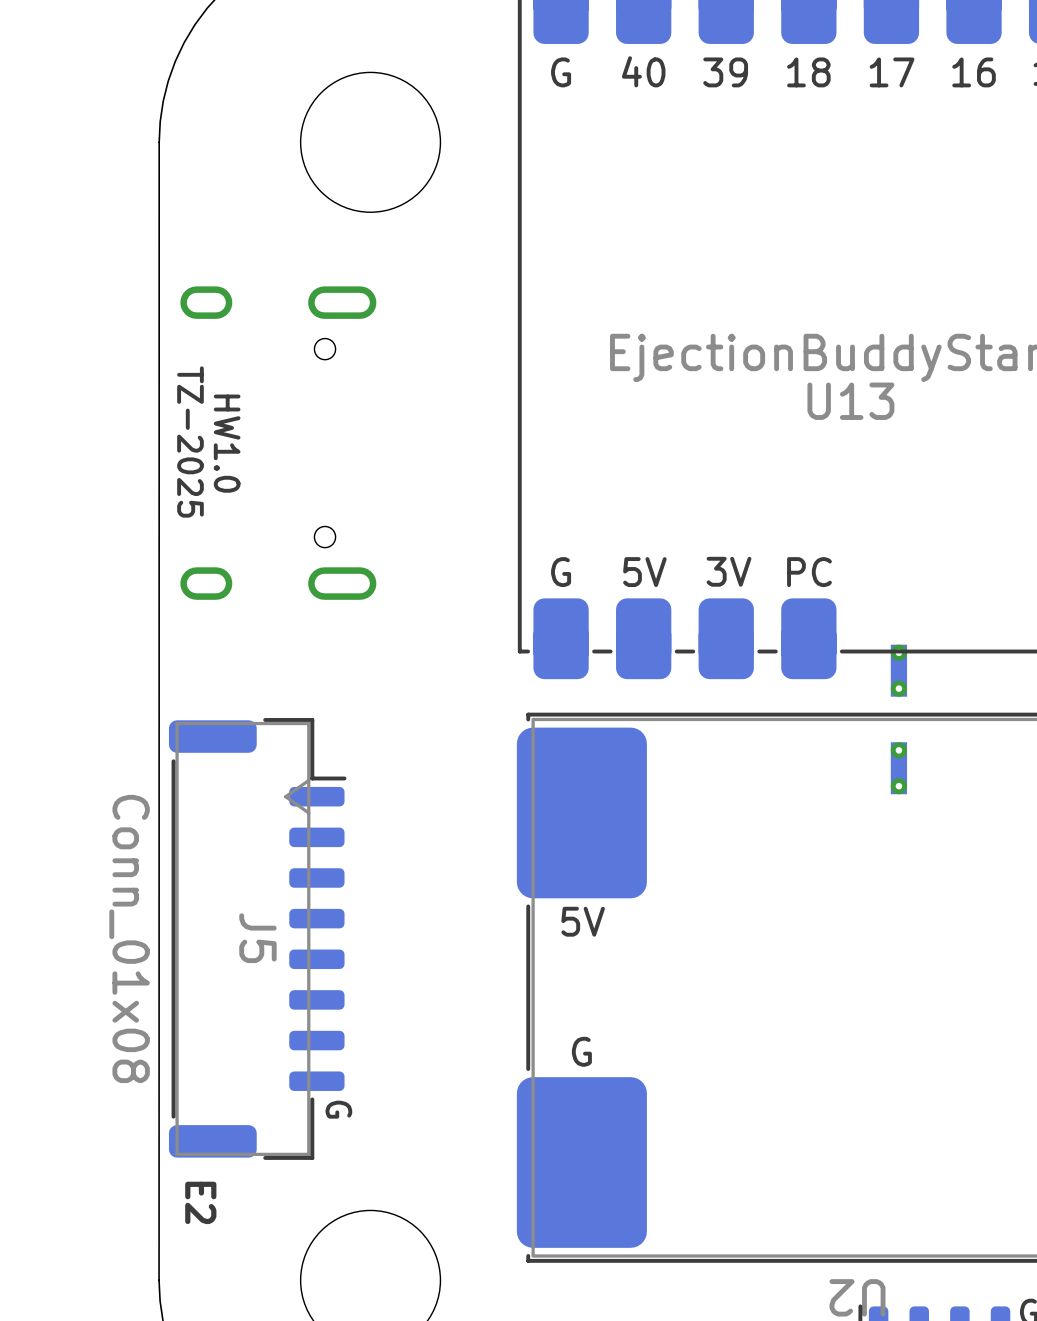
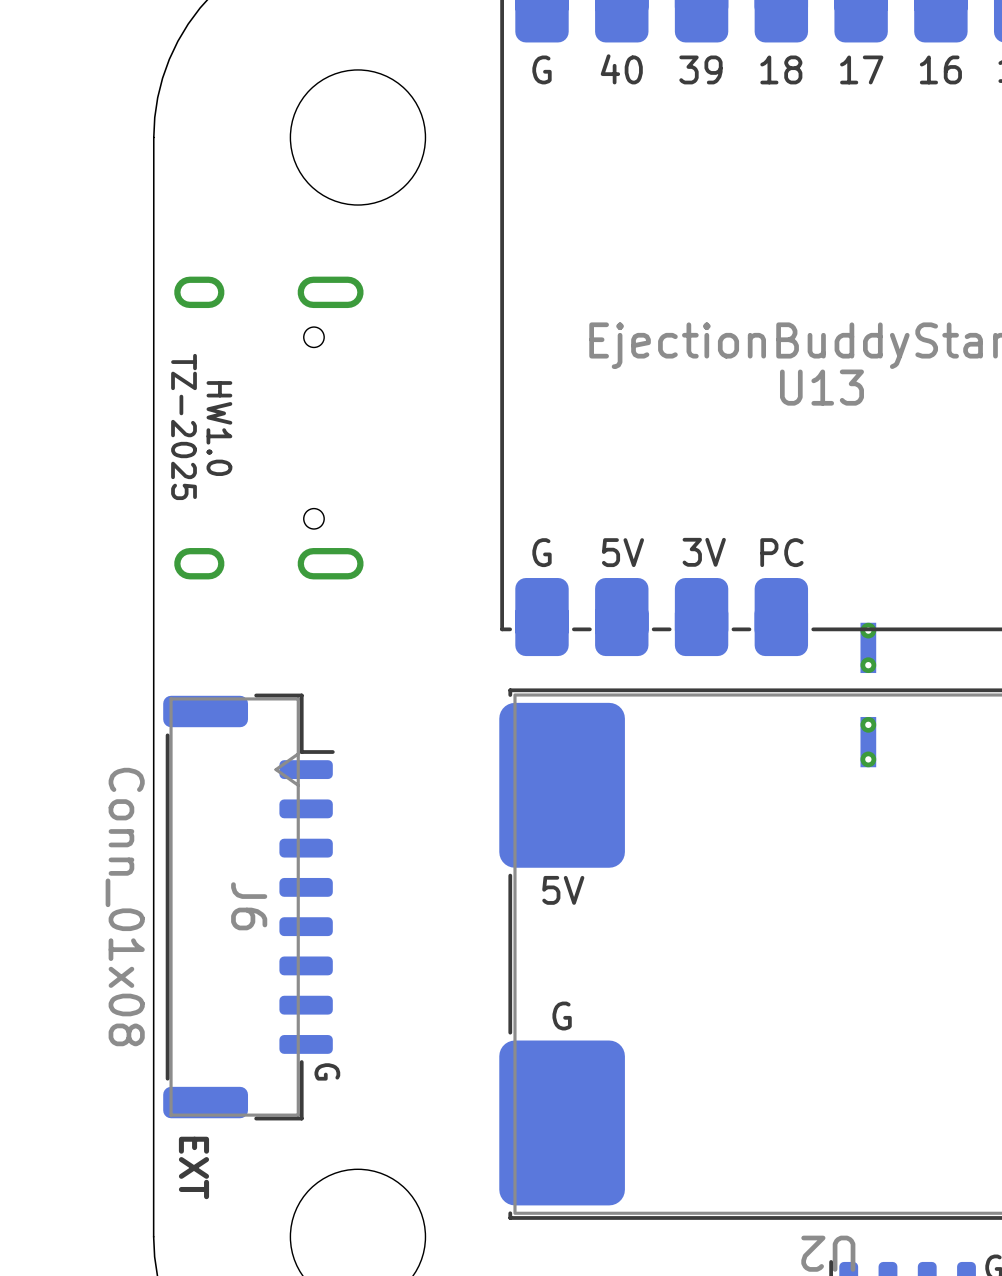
J5 name: J5 (257, 938) -> J6 (249, 906)
text: E2 (200, 1202) -> EXT (193, 1167)

